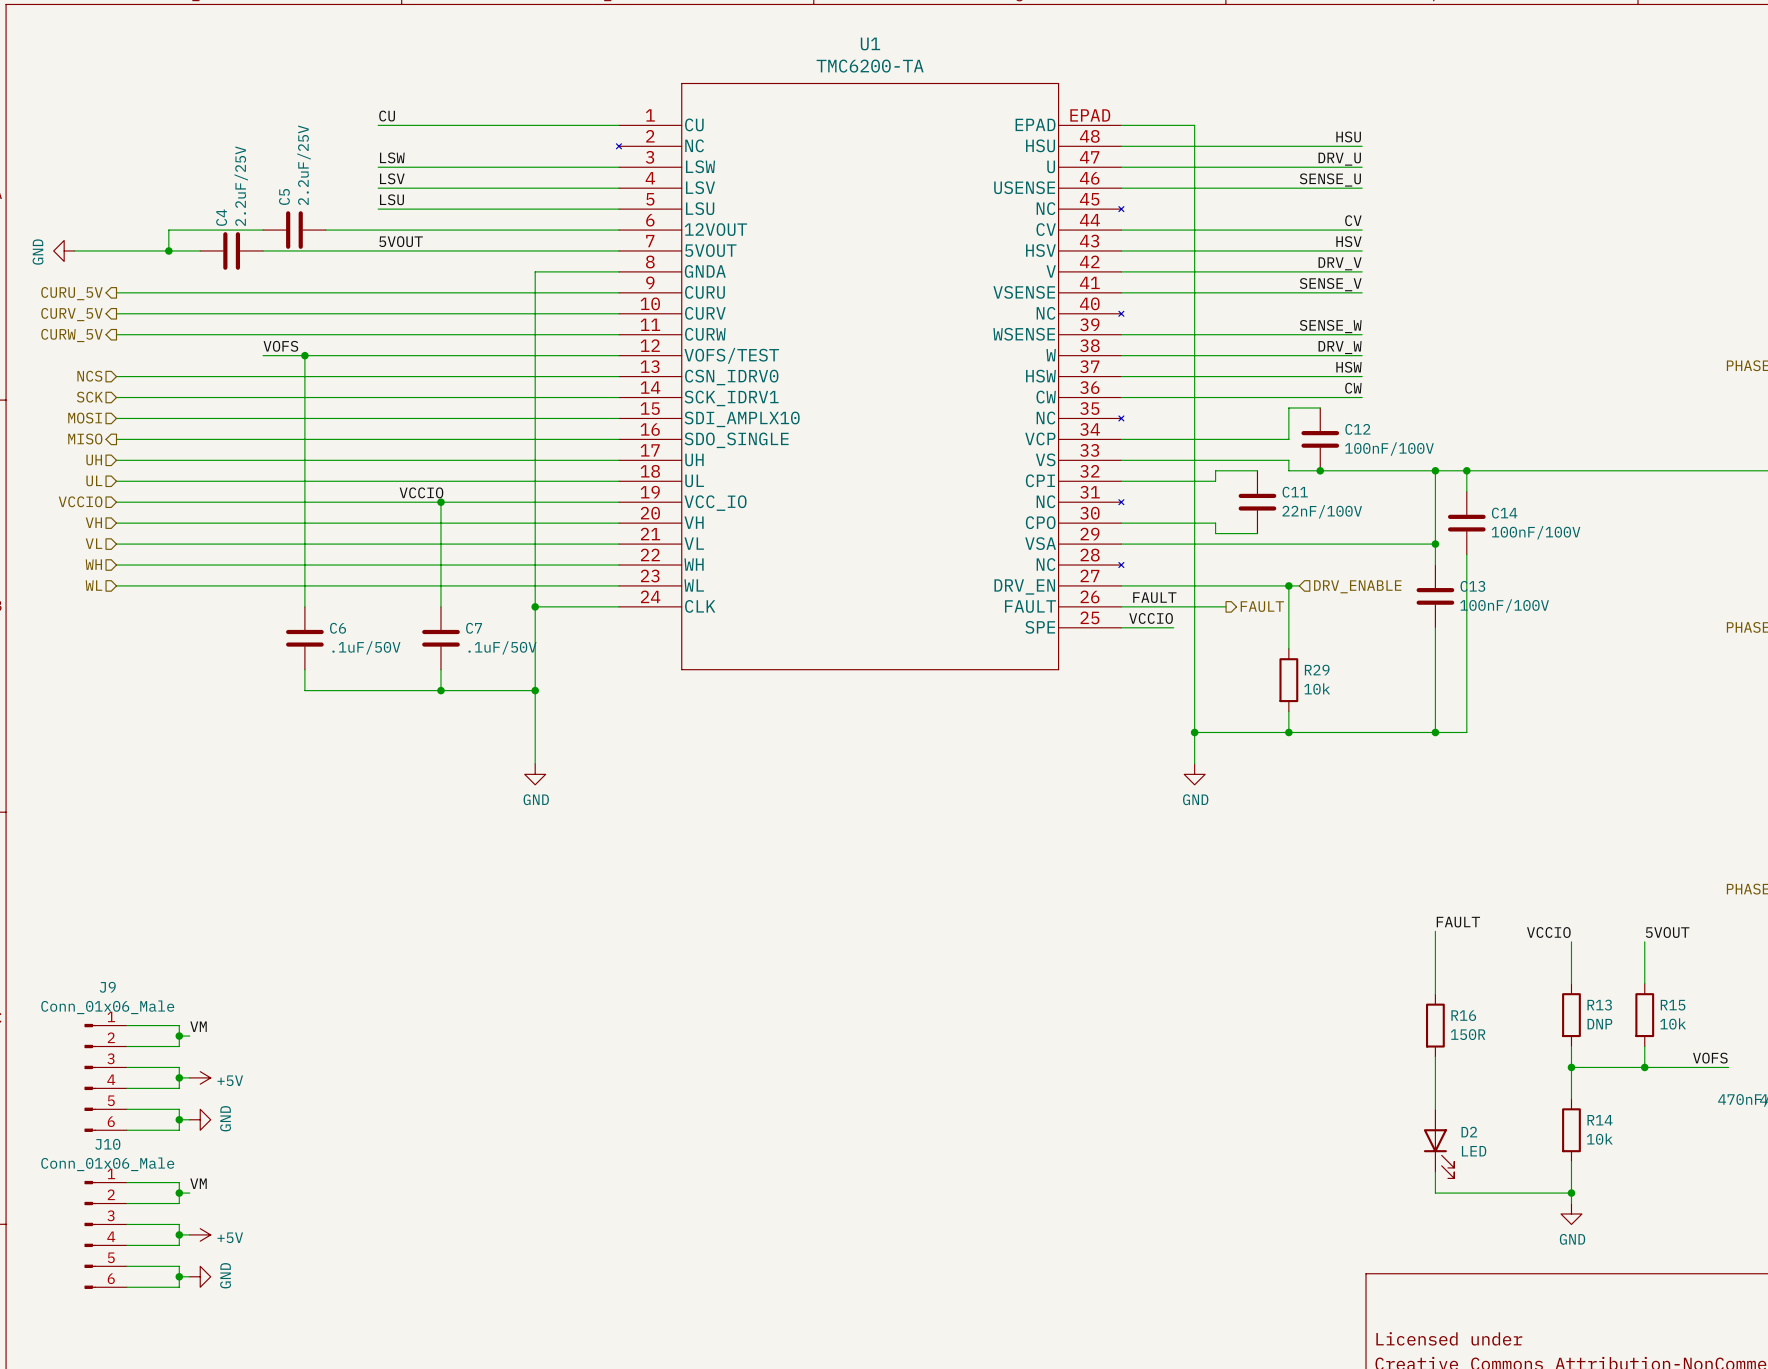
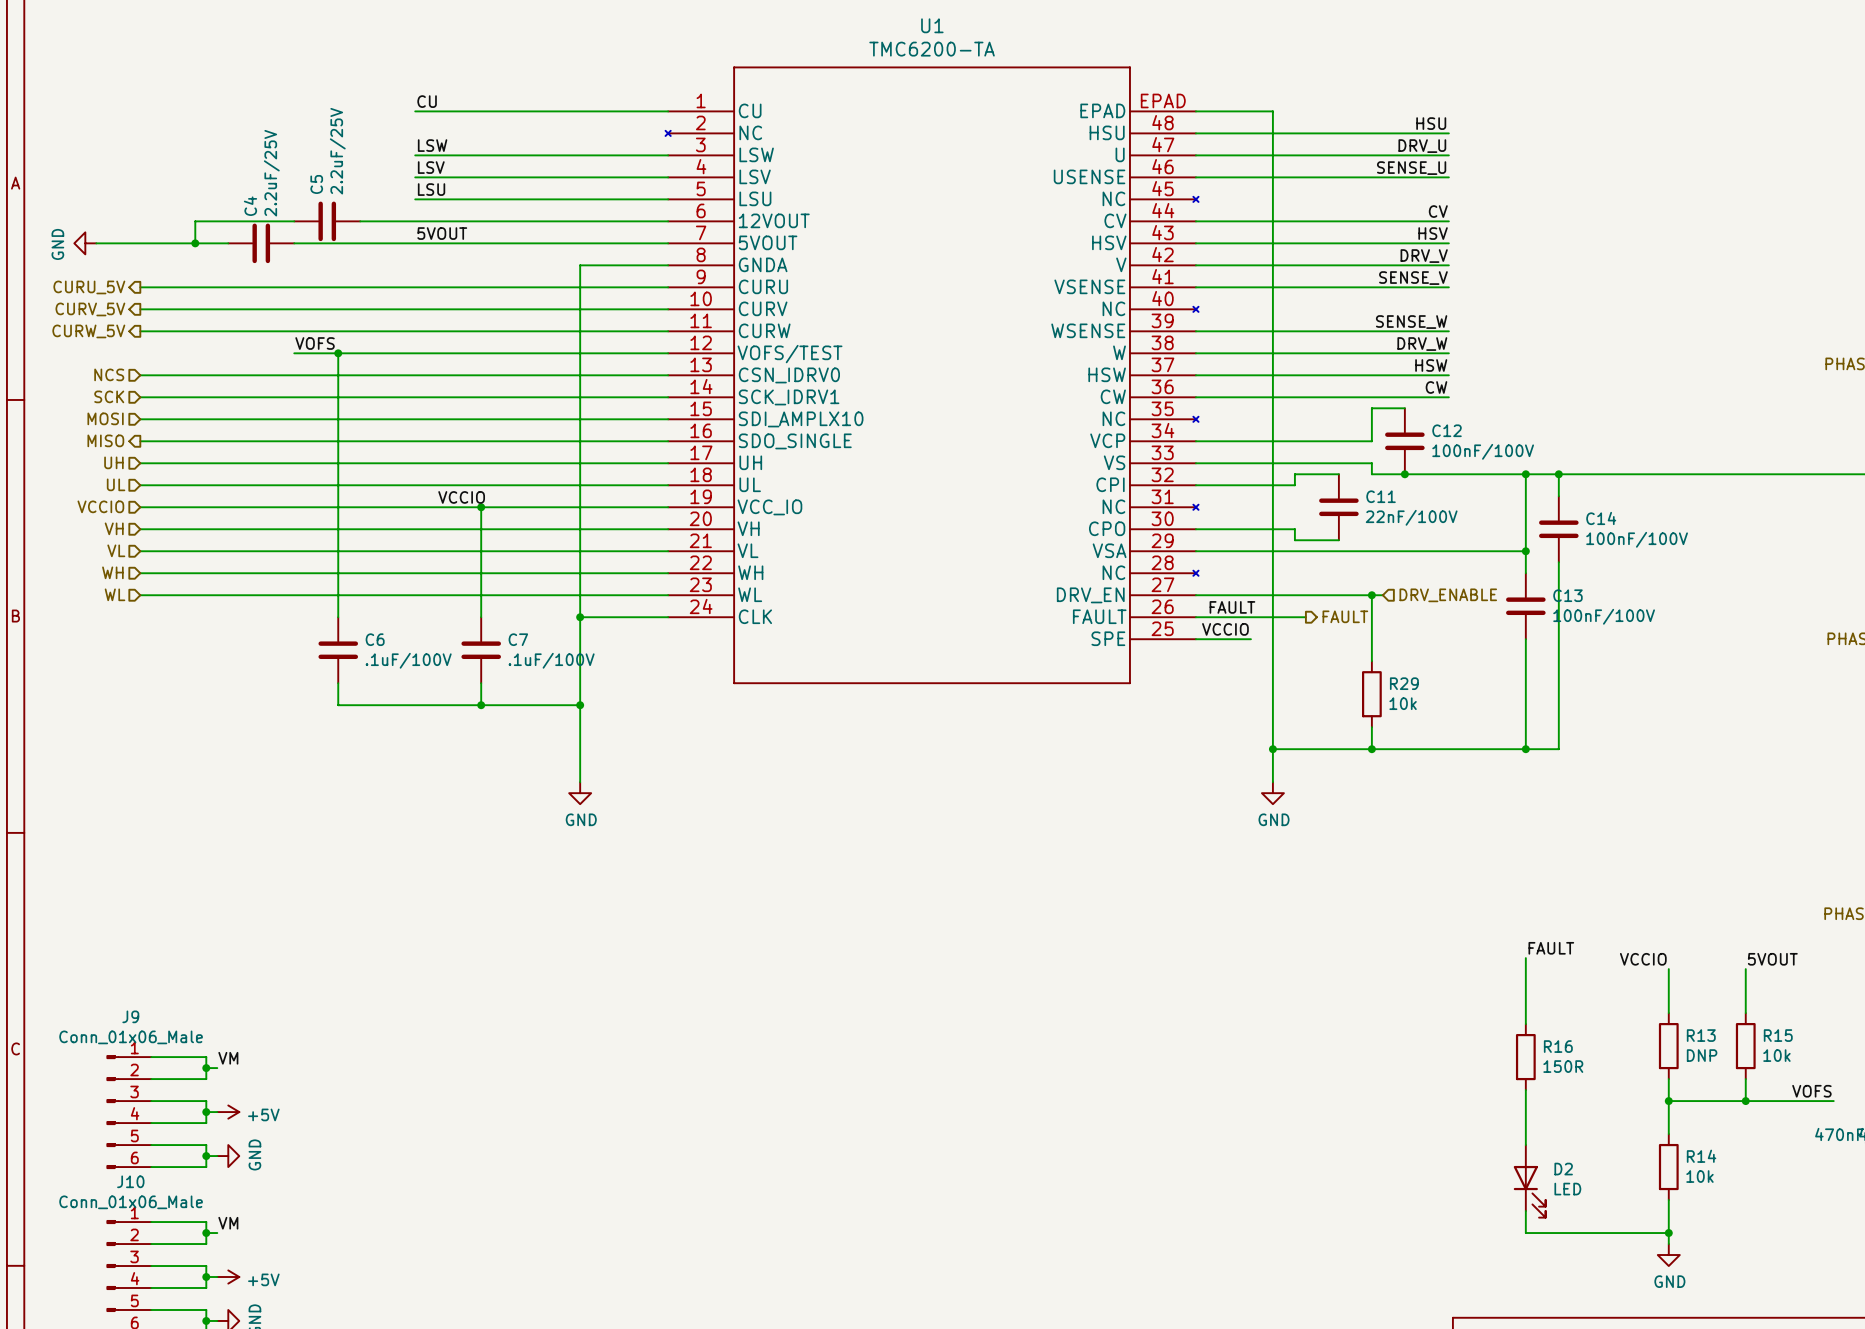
C6 value: .1uF/50V (366, 647) -> .1uF/100V (408, 660)
C7 value: .1uF/50V (502, 647) -> .1uF/100V (551, 660)

